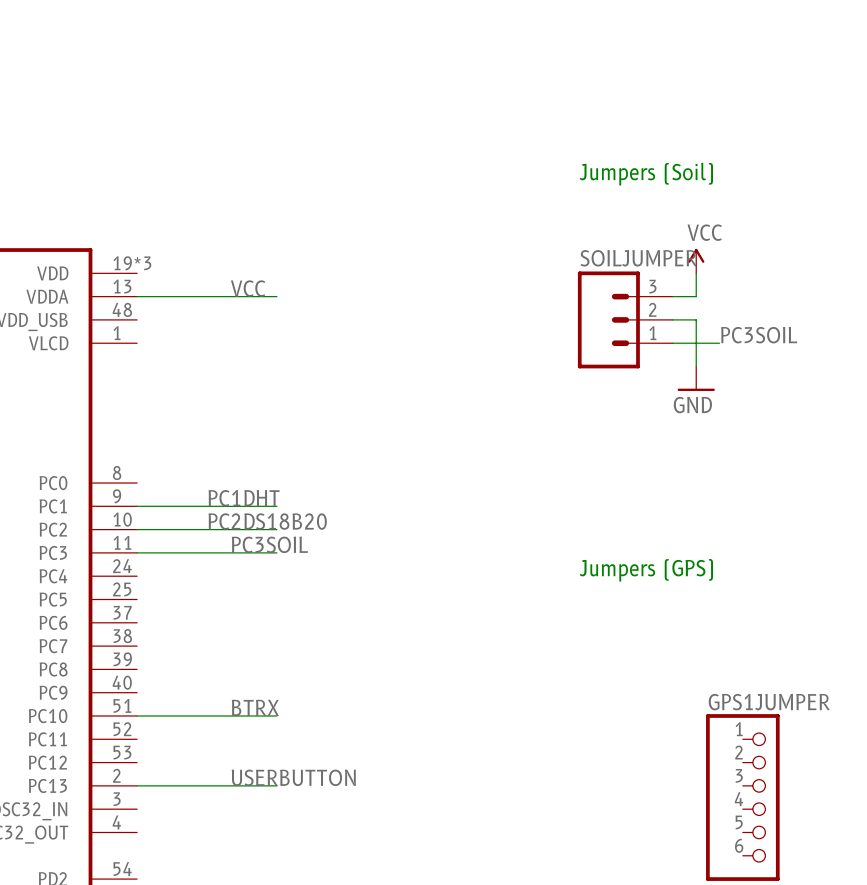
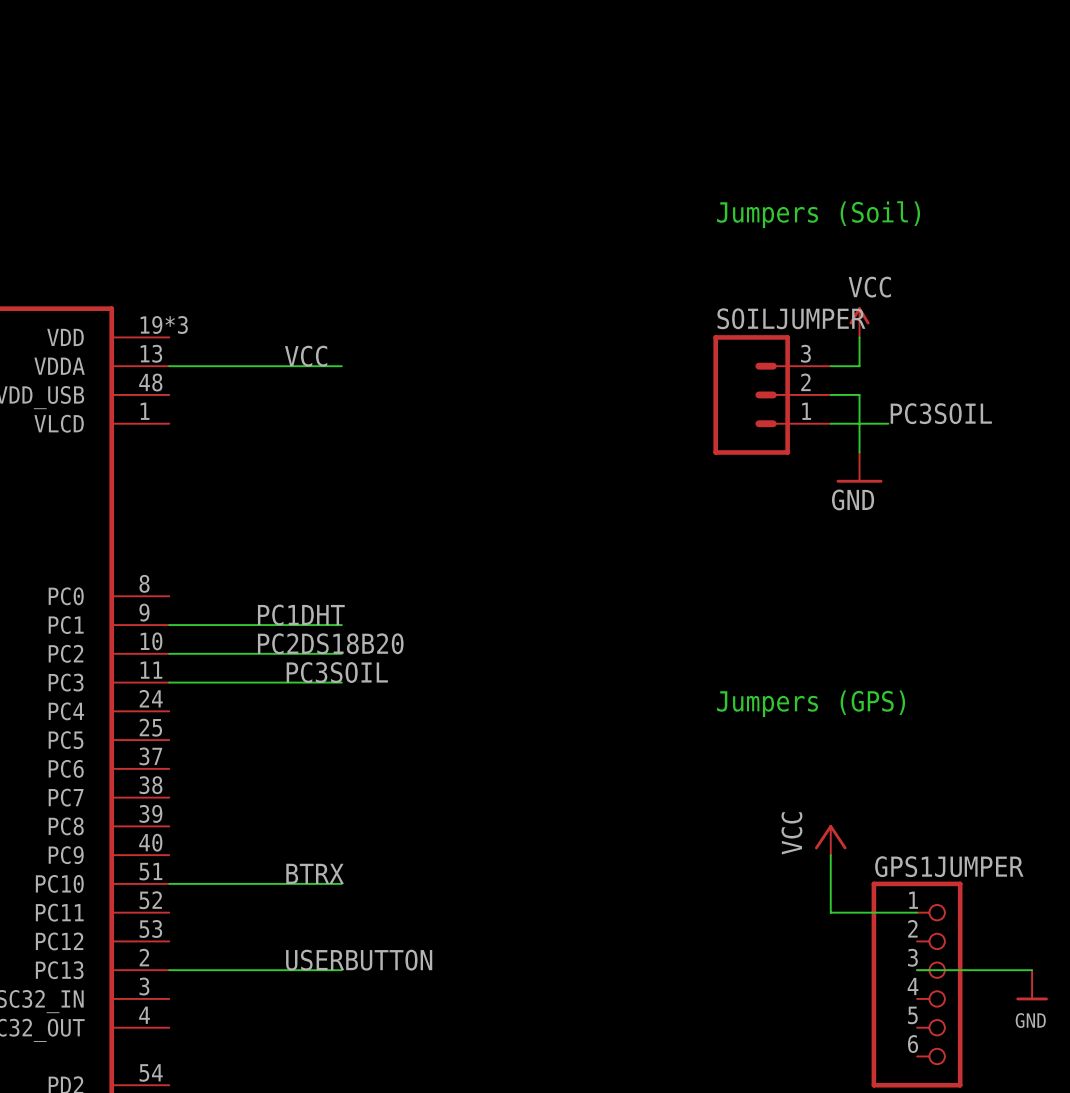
power symbol: none -> VCC (830, 840)
wire: none -> (830, 855) (830, 912) (917, 912)
wire: none -> (917, 970) (1032, 970)
power symbol: none -> GND (1032, 985)

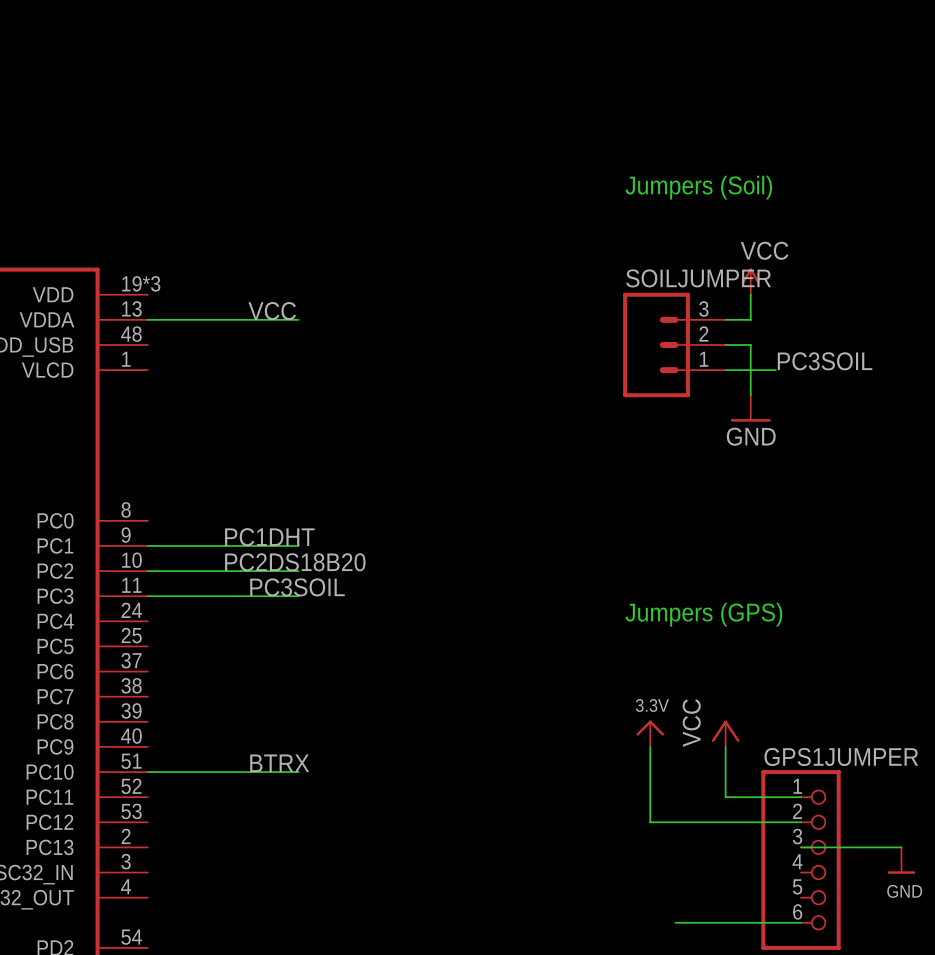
power symbol: none -> 3.3V (650, 733)
wire: none -> (650, 746) (650, 822) (801, 822)
label: USERBUTTON (359, 960) -> none
wire: (169, 970) (341, 970) -> none
wire: none -> (675, 922) (801, 922)

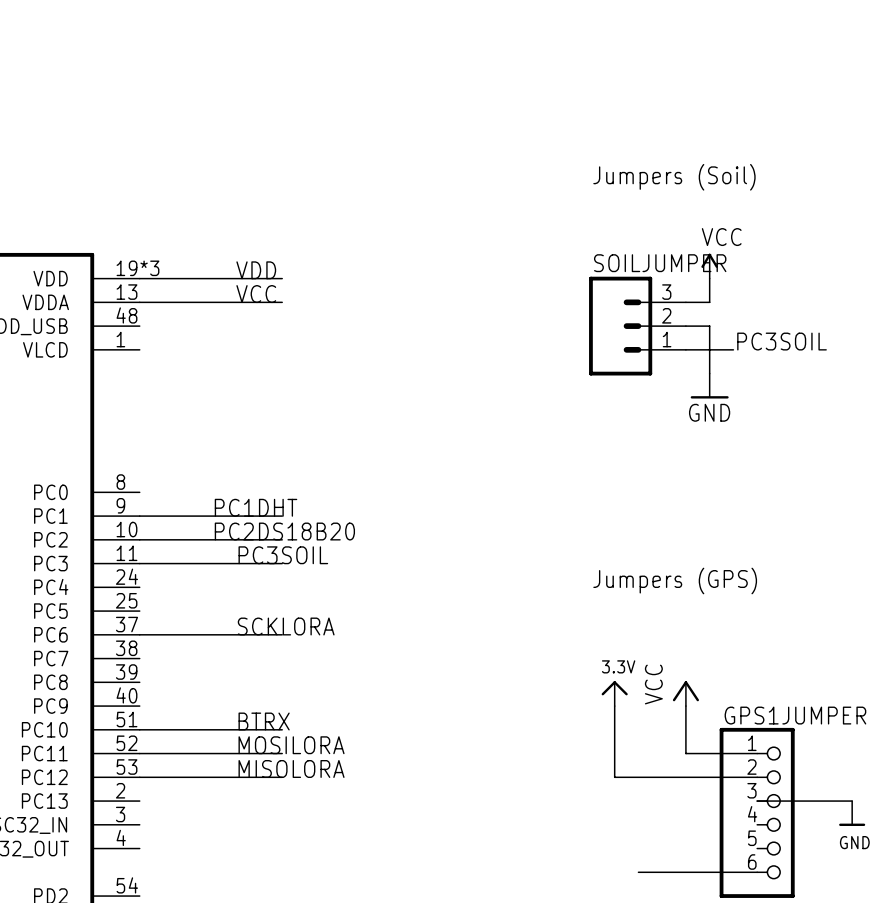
label: none -> VDD (256, 270)
wire: none -> (139, 278) (282, 278)
label: none -> SCKLORA (286, 626)
wire: none -> (139, 634) (282, 634)
label: none -> MOSILORA (291, 745)
wire: none -> (139, 753) (282, 753)
label: none -> MISOLORA (291, 768)
wire: none -> (139, 777) (282, 777)

